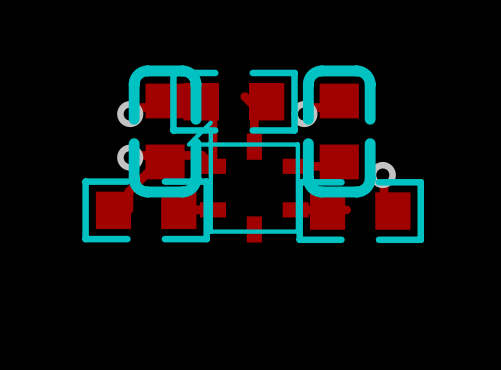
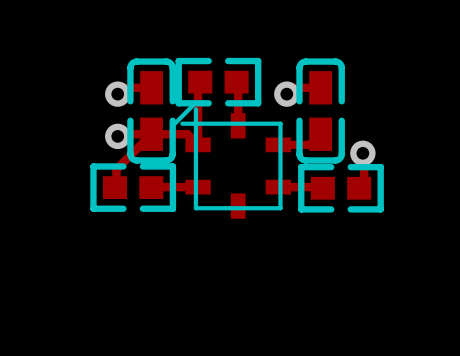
part footprint: [128, 65, 202, 198] -> [127, 58, 176, 164]
part footprint: [302, 65, 376, 198] -> [296, 58, 345, 164]
part footprint: [170, 69, 298, 134] -> [175, 57, 262, 107]
part footprint: [82, 178, 210, 243] -> [90, 163, 177, 212]
part footprint: [296, 179, 425, 244] -> [298, 163, 384, 213]

